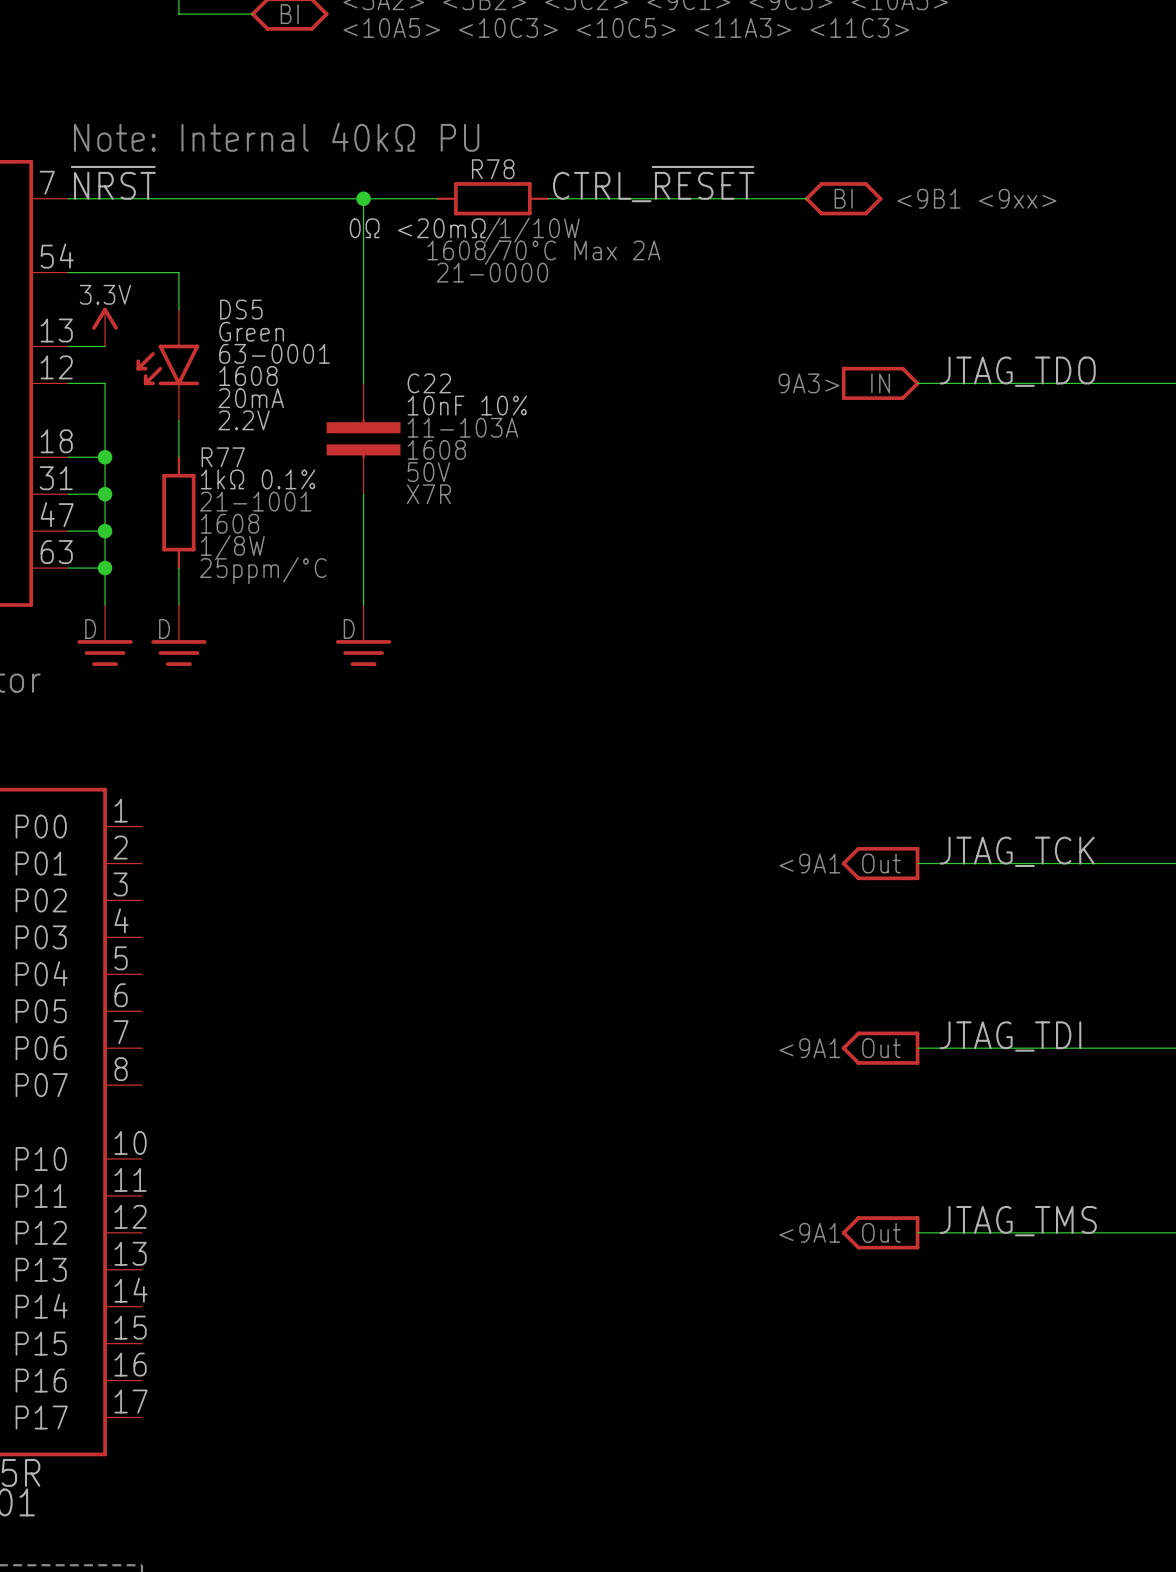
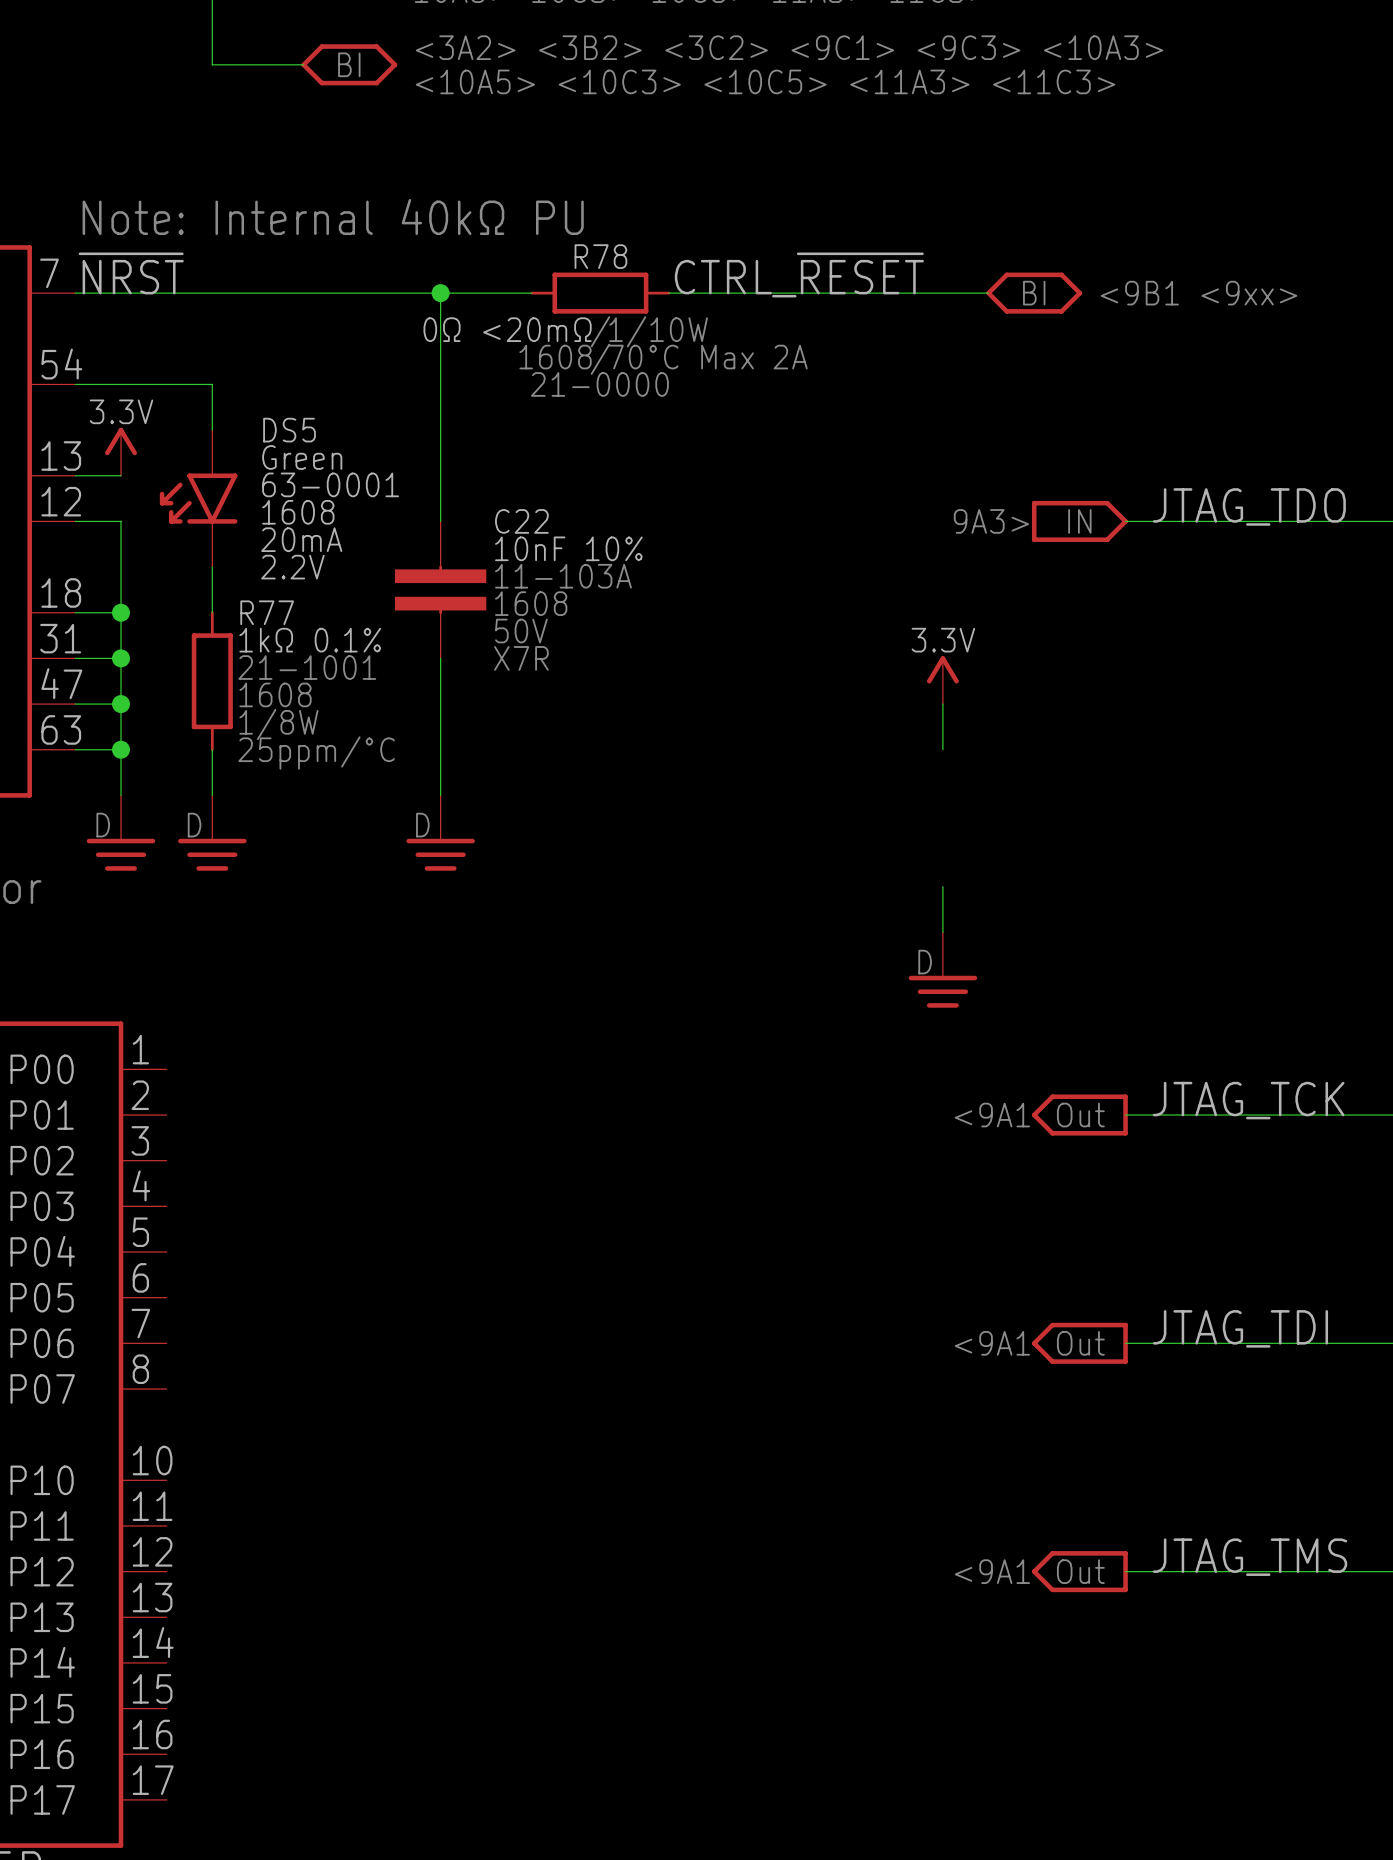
power symbol: none -> 3.3V (942, 680)
wire: none -> (942, 704) (942, 749)
wire: none -> (942, 886) (942, 932)
power symbol: none -> (942, 970)

